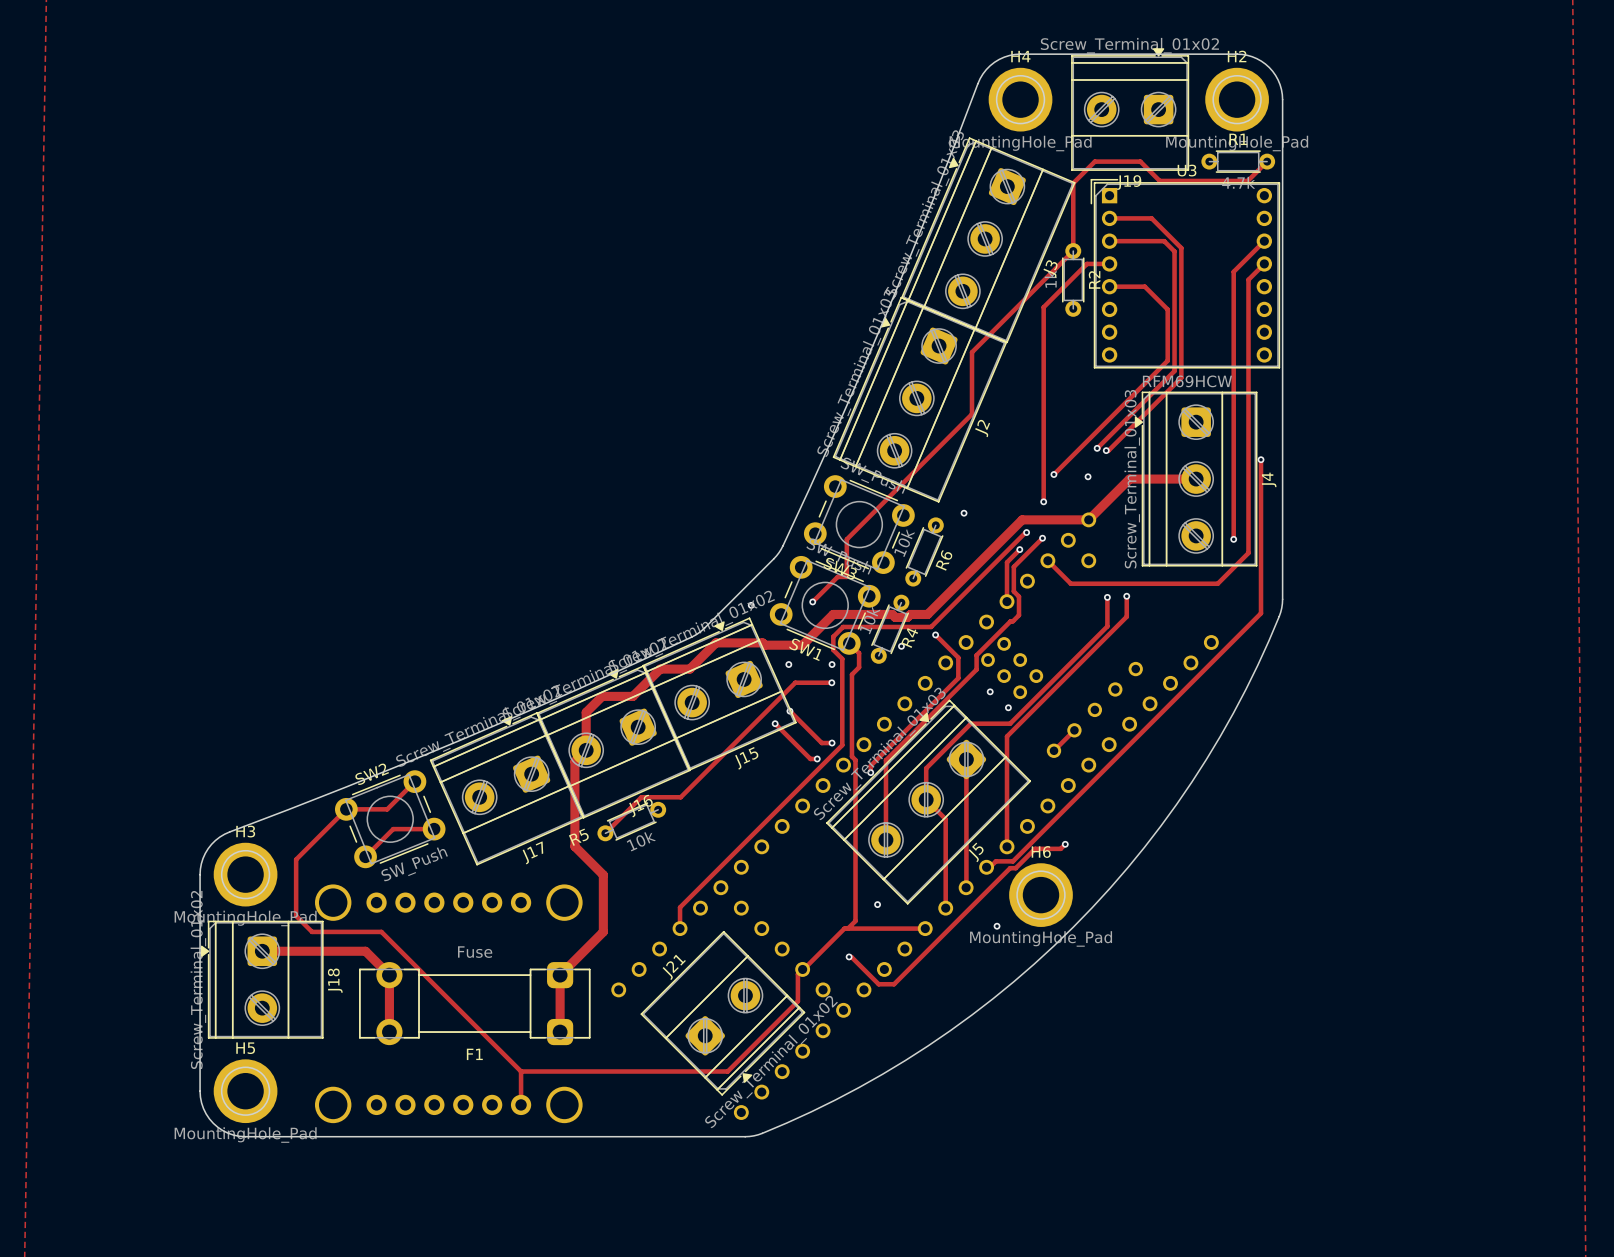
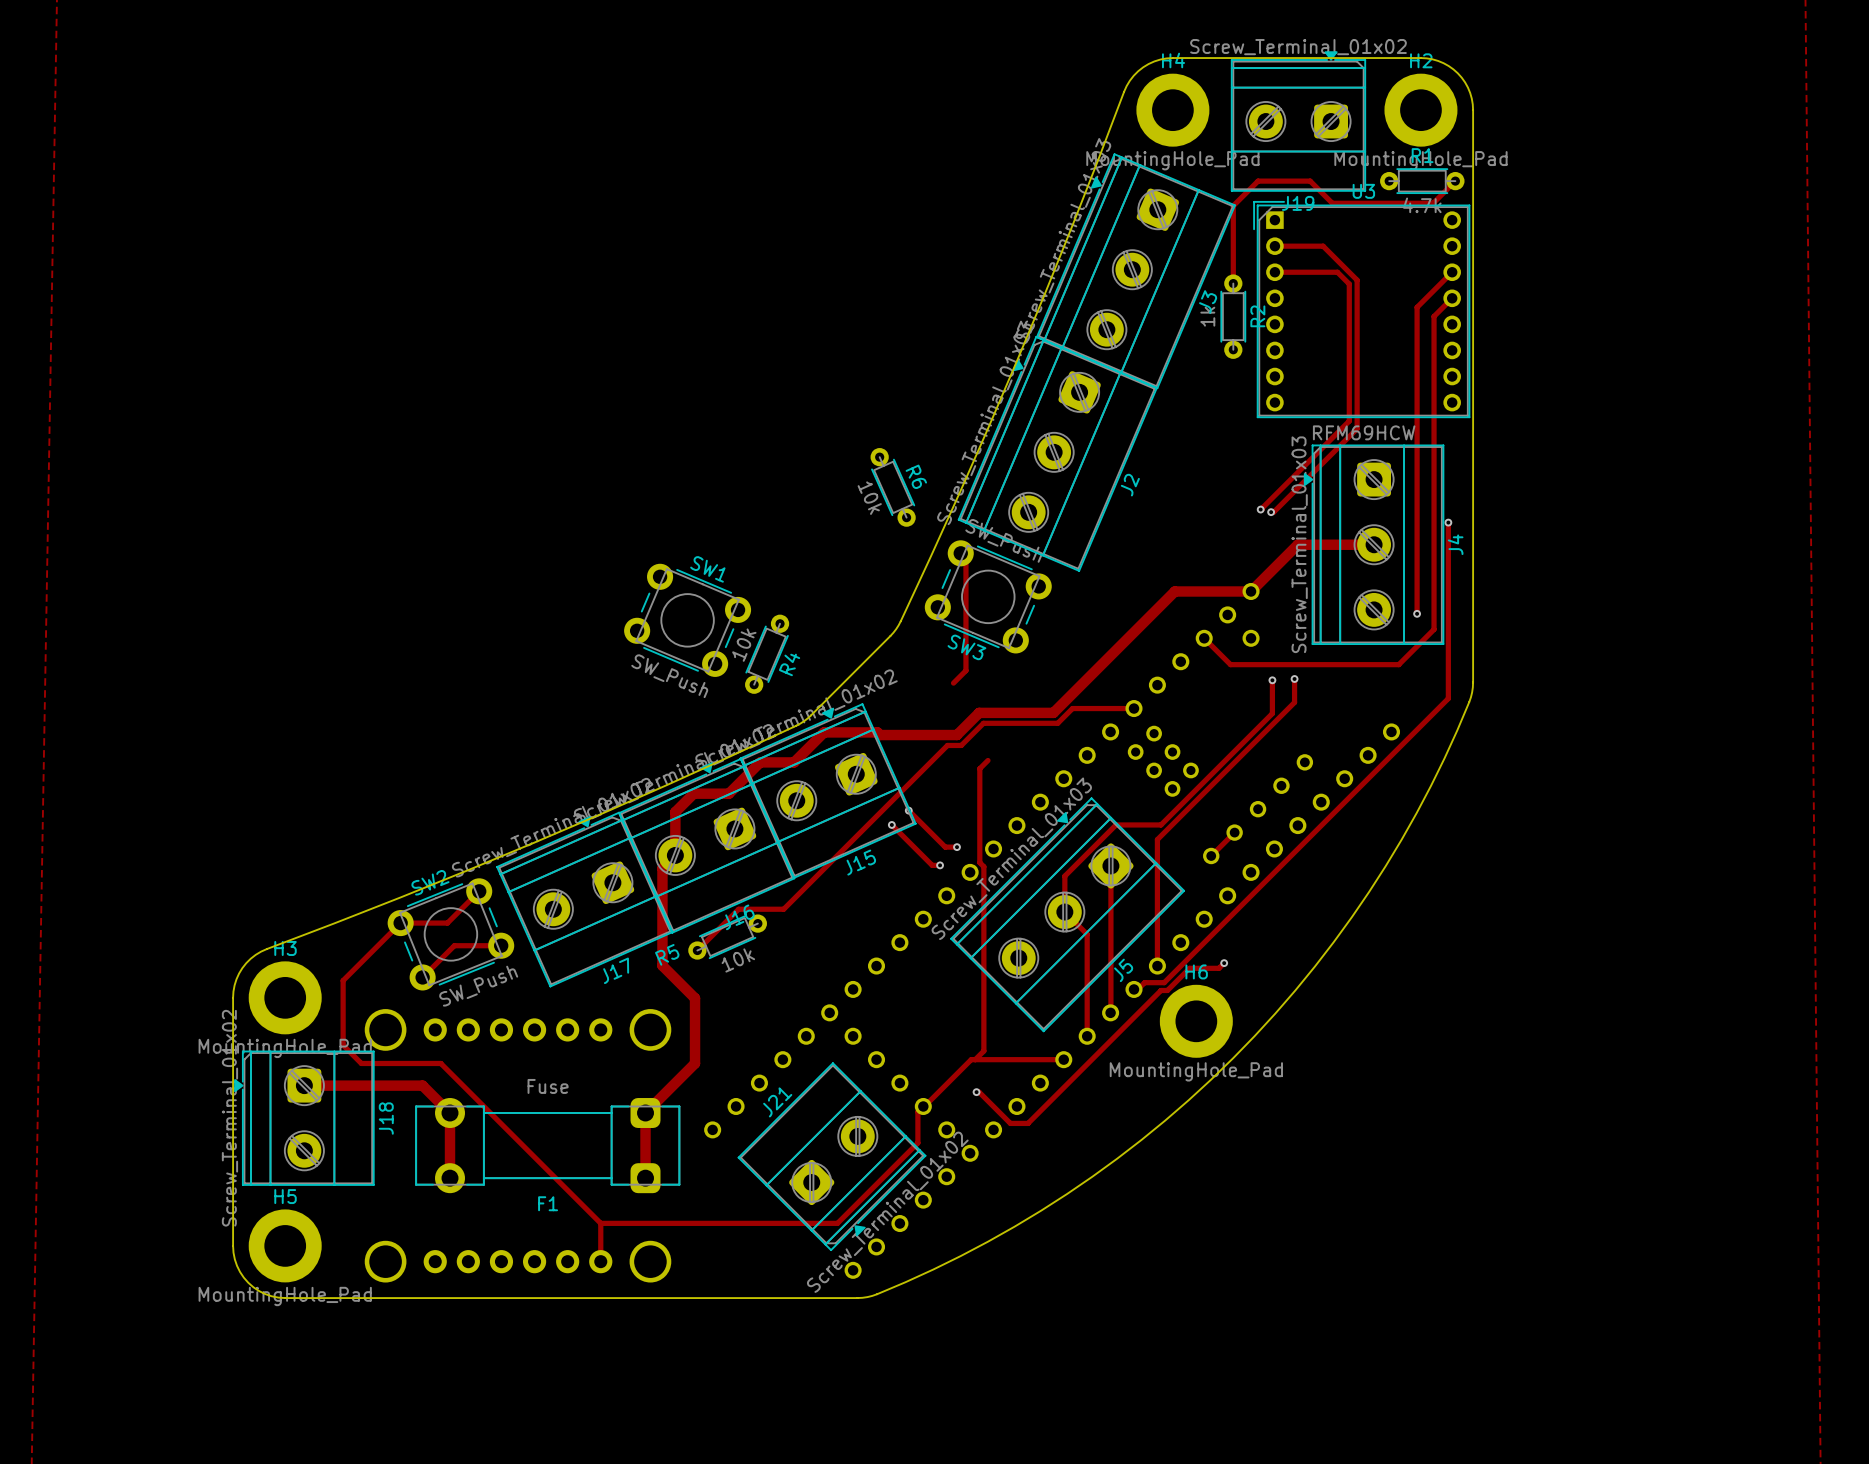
track: (1073, 251) (972, 352) (972, 414) (846, 539) (846, 576) (837, 576) (812, 601) -> none
track: (1109, 263) (1087, 263) (1043, 307) (1043, 501) -> none
track: (1109, 286) (1144, 286) (1167, 309) (1167, 360) (1053, 474) -> none
via: (1053, 474) -> none
via: (1088, 476) -> none
track: none -> (965, 559) (965, 670) (953, 683)
via: (1043, 501) -> none
via: (964, 513) -> none
track: (1026, 532) (931, 626) (843, 626) (833, 636) (833, 649) (842, 658) (842, 745) (680, 907) (680, 928) -> none
via: (1026, 532) -> none
track: (1042, 538) (1013, 566) (1013, 591) (1019, 596) (1019, 615) (976, 655) (976, 669) (885, 760) (885, 839) -> none
via: (1042, 538) -> none
track: (1019, 549) (1007, 562) (1007, 601) -> none
via: (1019, 549) -> none
R6 rotation: 0° (924, 551) -> 47° counterclockwise (893, 487)
R6 position: (924, 551) -> (893, 487)
via: (812, 601) -> none
via: (751, 605) -> none
SW1 rotation: 0° (825, 605) -> 180° (687, 620)
SW1 position: (825, 605) -> (687, 620)
track: (927, 614) (910, 614) (907, 617) (895, 617) (892, 614) (833, 614) (802, 645) -> (1066, 699) (1053, 712) (979, 712) (957, 735) (923, 735)
R4 position: (890, 629) -> (767, 654)
track: (935, 634) (958, 657) (958, 678) (870, 765) (870, 772) -> none
via: (935, 634) -> none
track: (849, 643) (859, 653) (859, 667) -> none
via: (901, 646) -> none
via: (788, 664) -> none
via: (832, 664) -> none
track: (795, 682) (831, 682) -> (914, 778) (947, 745) (961, 745) (983, 723) (1057, 723) (1072, 708) (1134, 708)
via: (831, 682) -> none
via: (990, 691) -> none
via: (1008, 707) -> none
via: (870, 772) -> none
via: (877, 904) -> none
via: (997, 926) -> none

